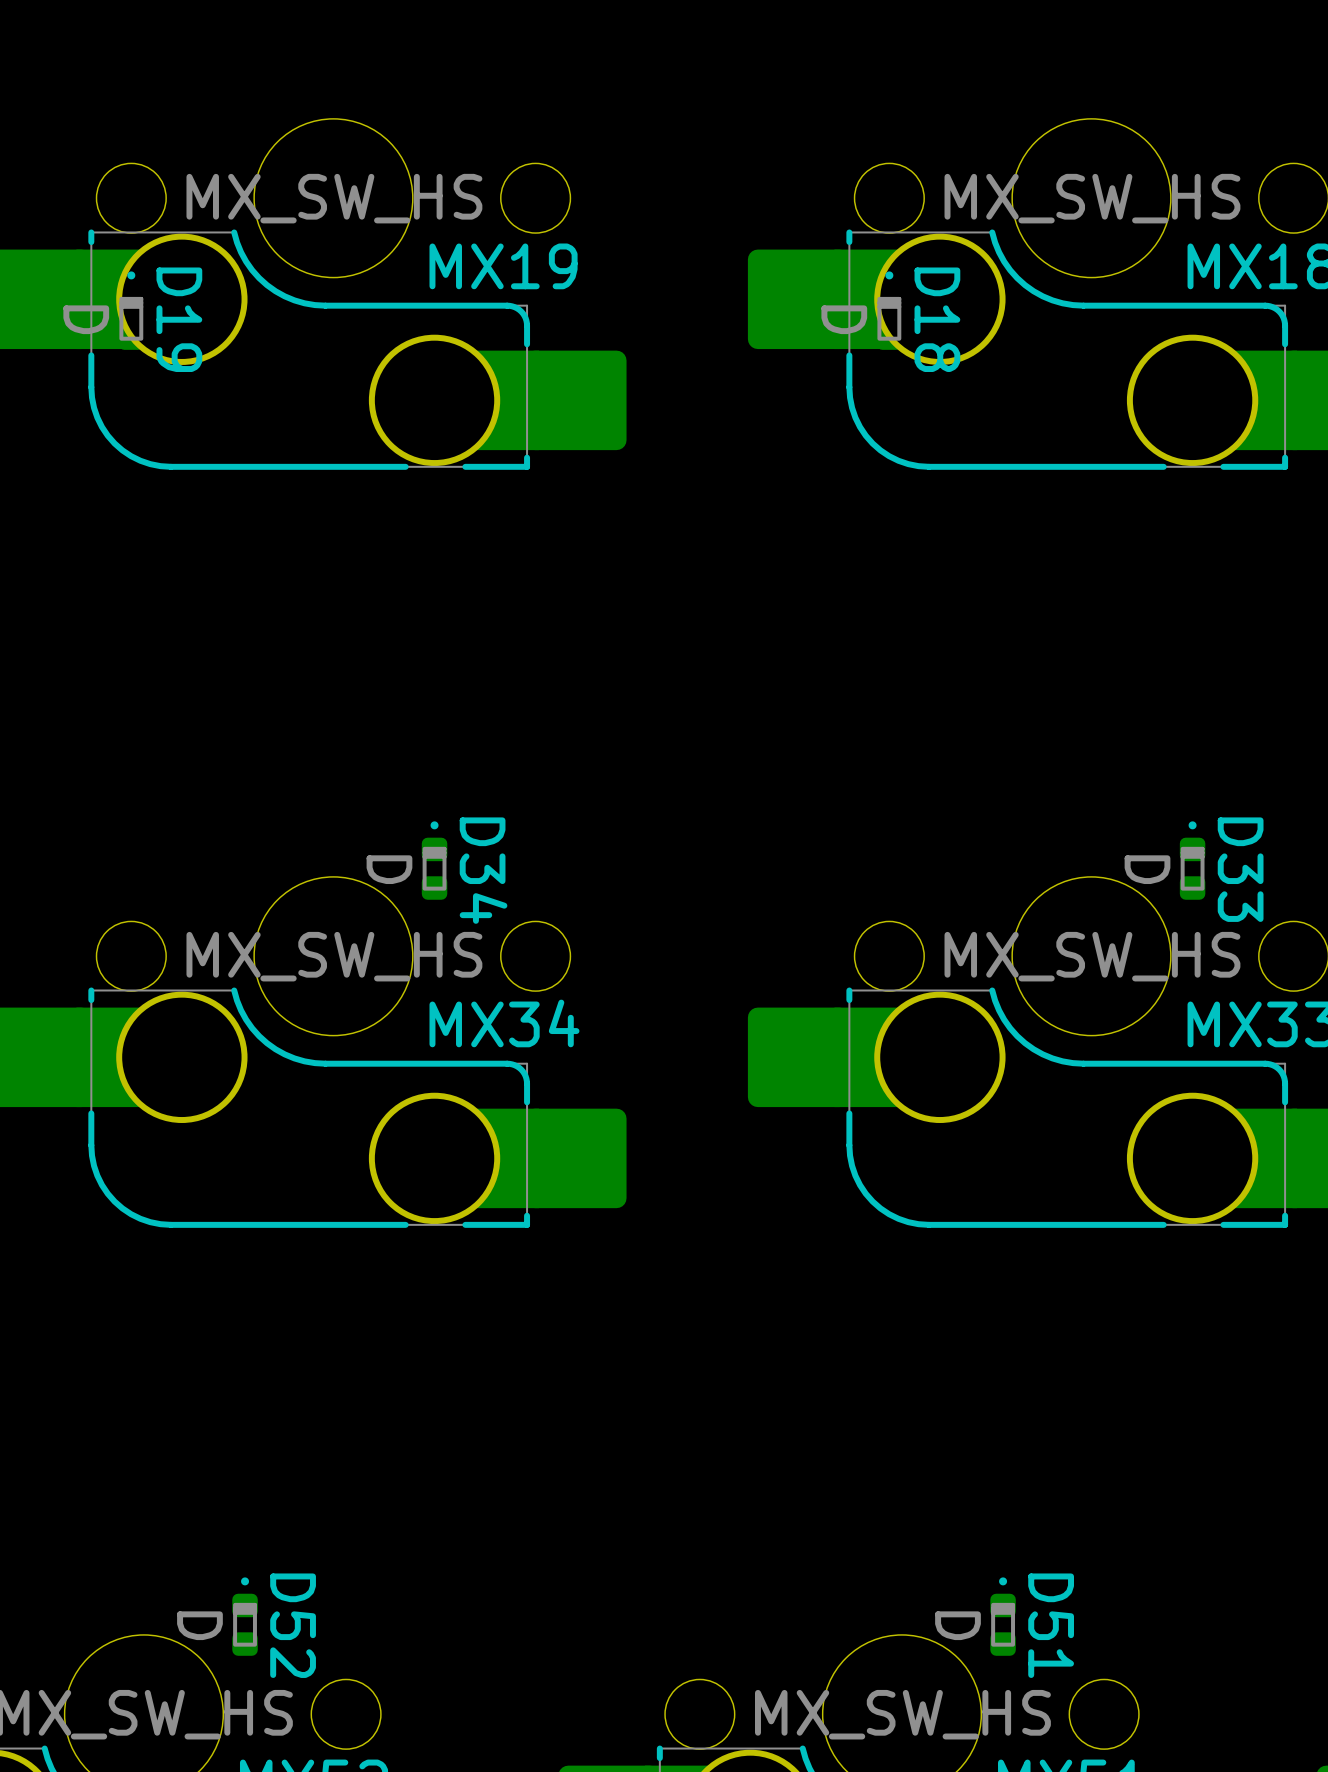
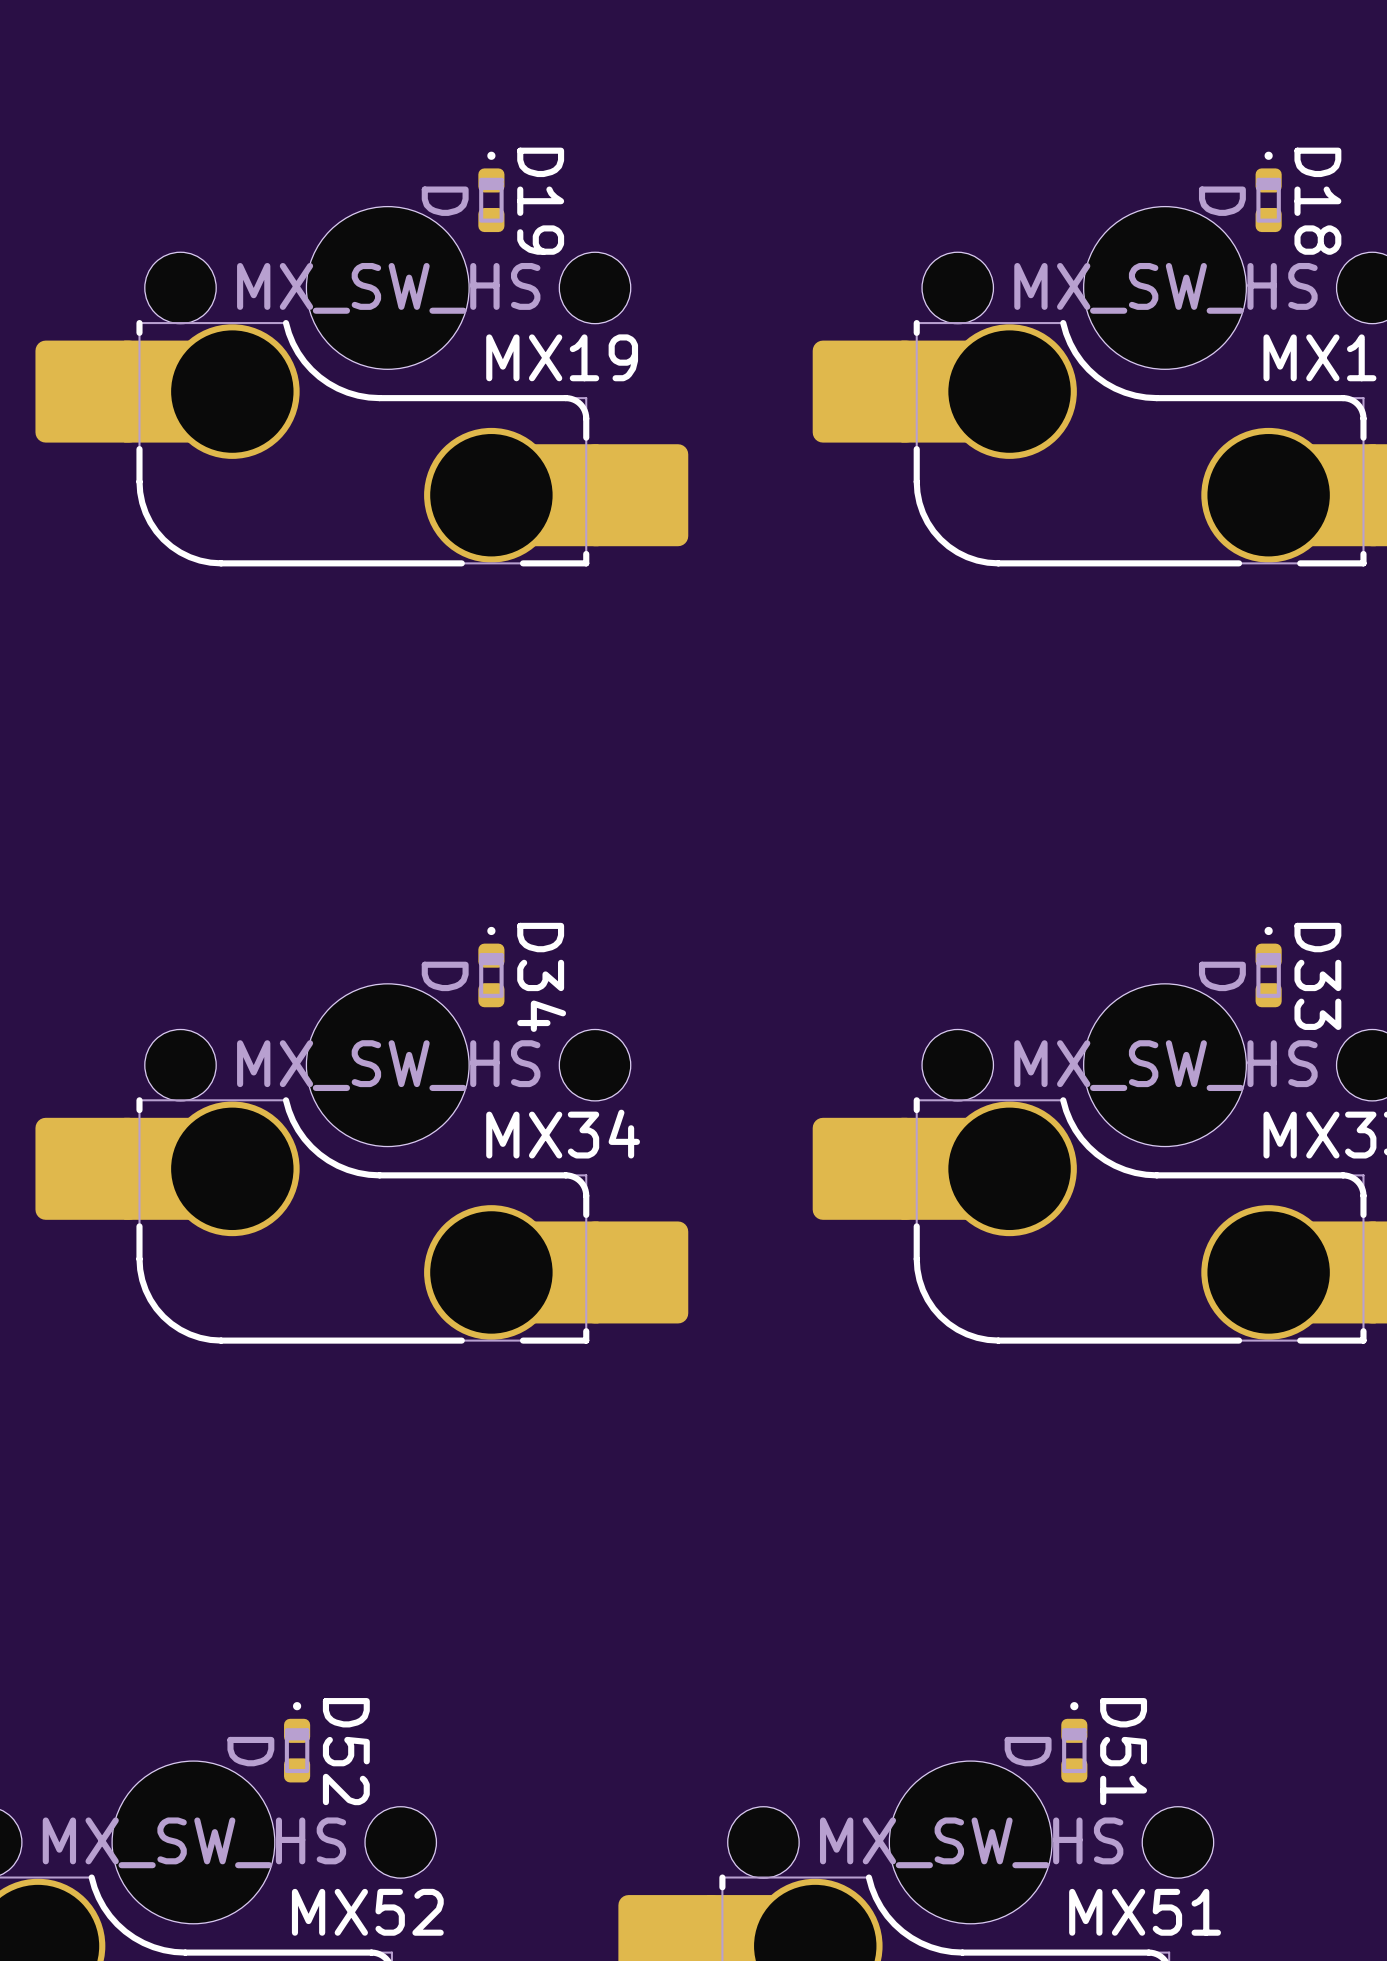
D19 position: (131, 310) -> (491, 191)
D18 position: (889, 310) -> (1268, 191)

